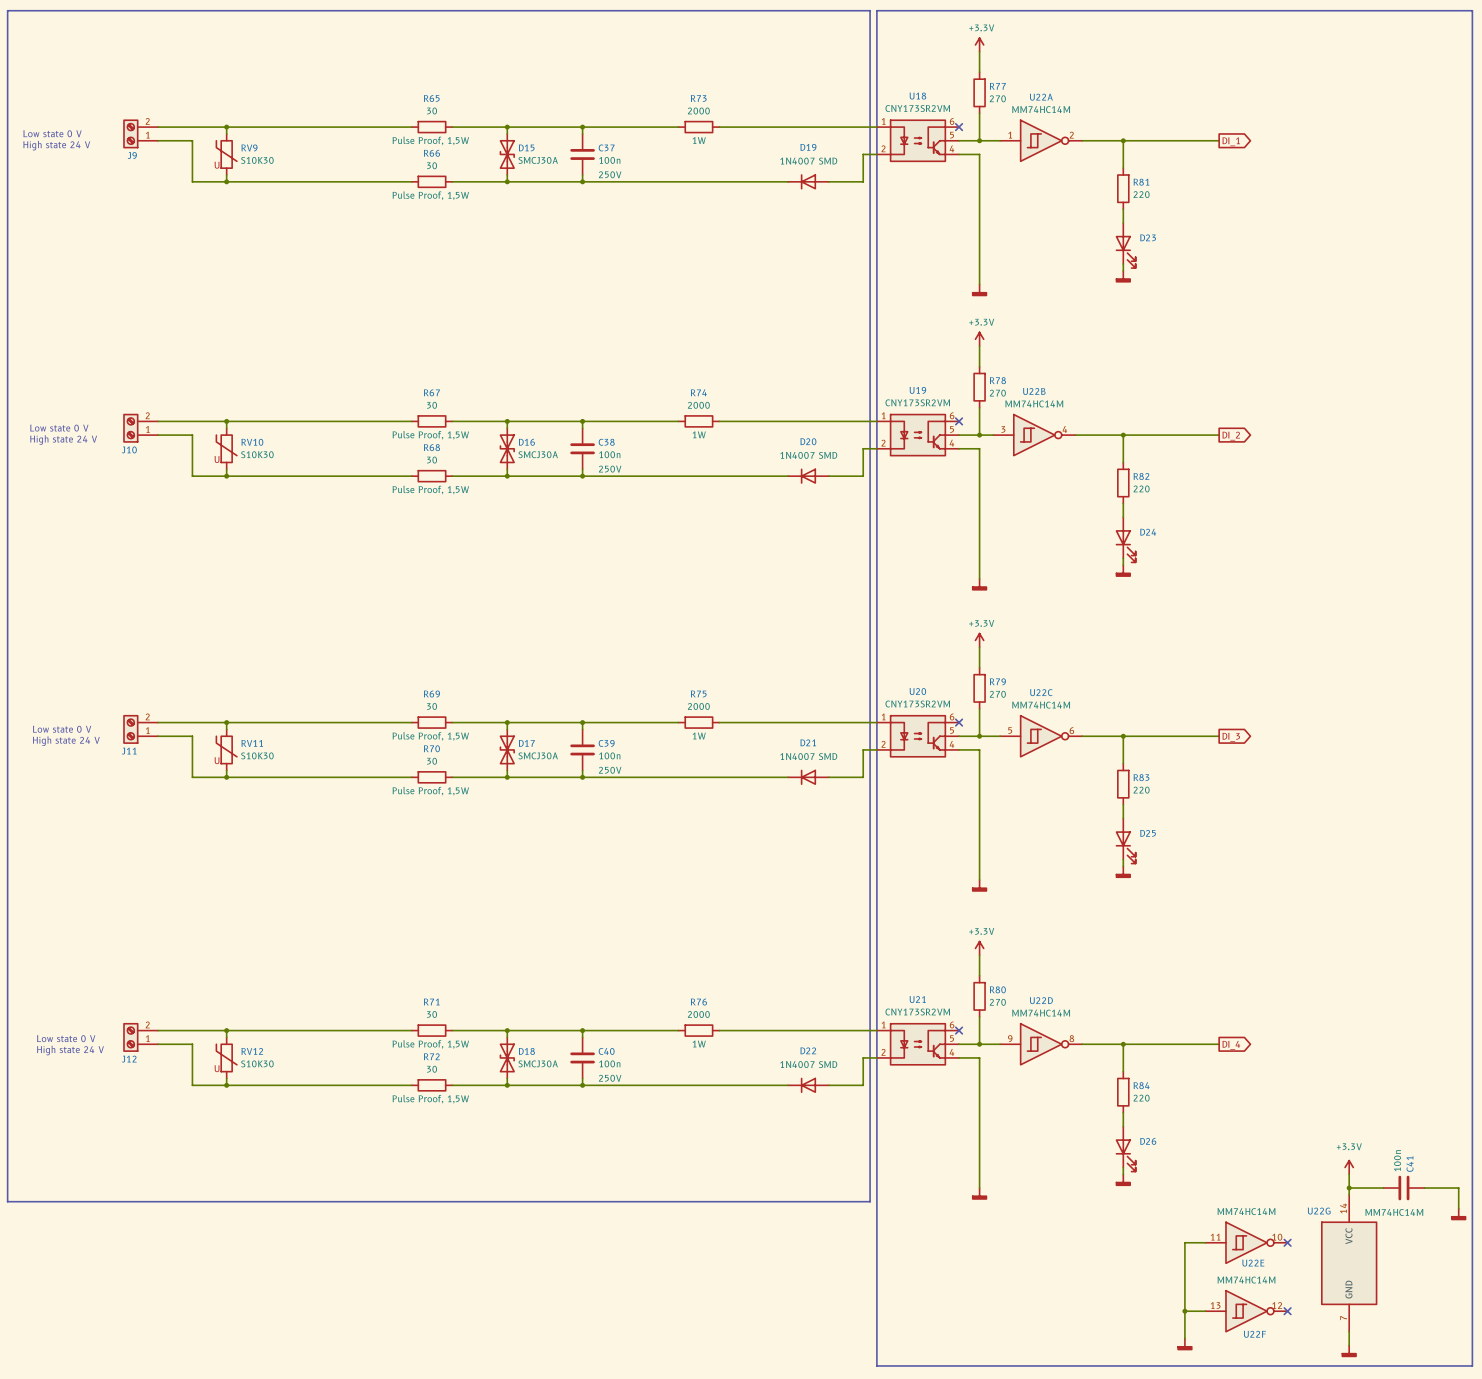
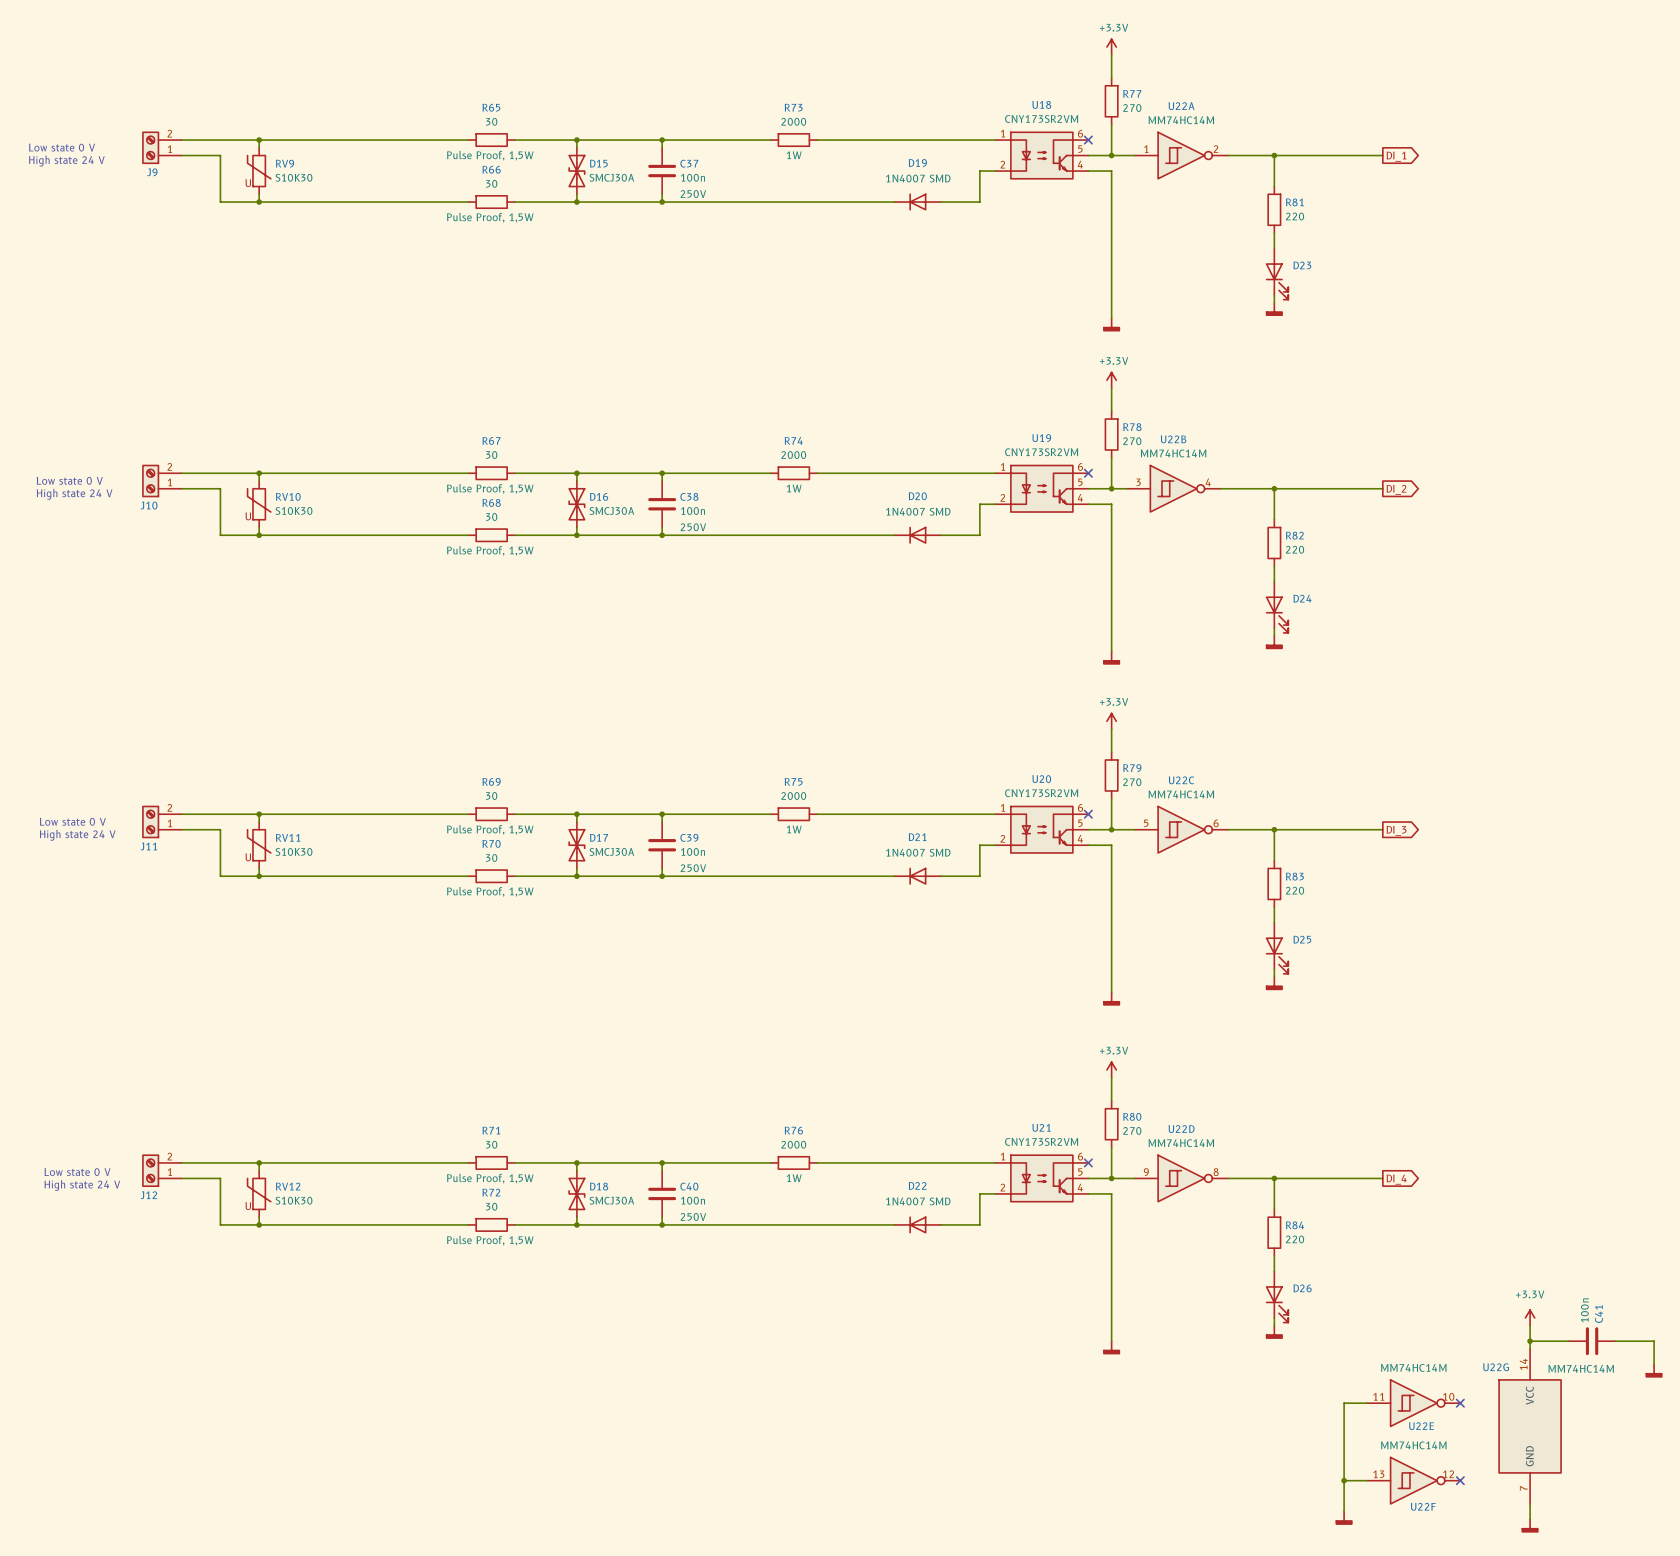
line: (7, 10) (870, 10) (870, 1201) (7, 1201) (7, 10) -> none
line: (876, 10) (1472, 10) (1472, 1365) (876, 1365) (876, 10) -> none

